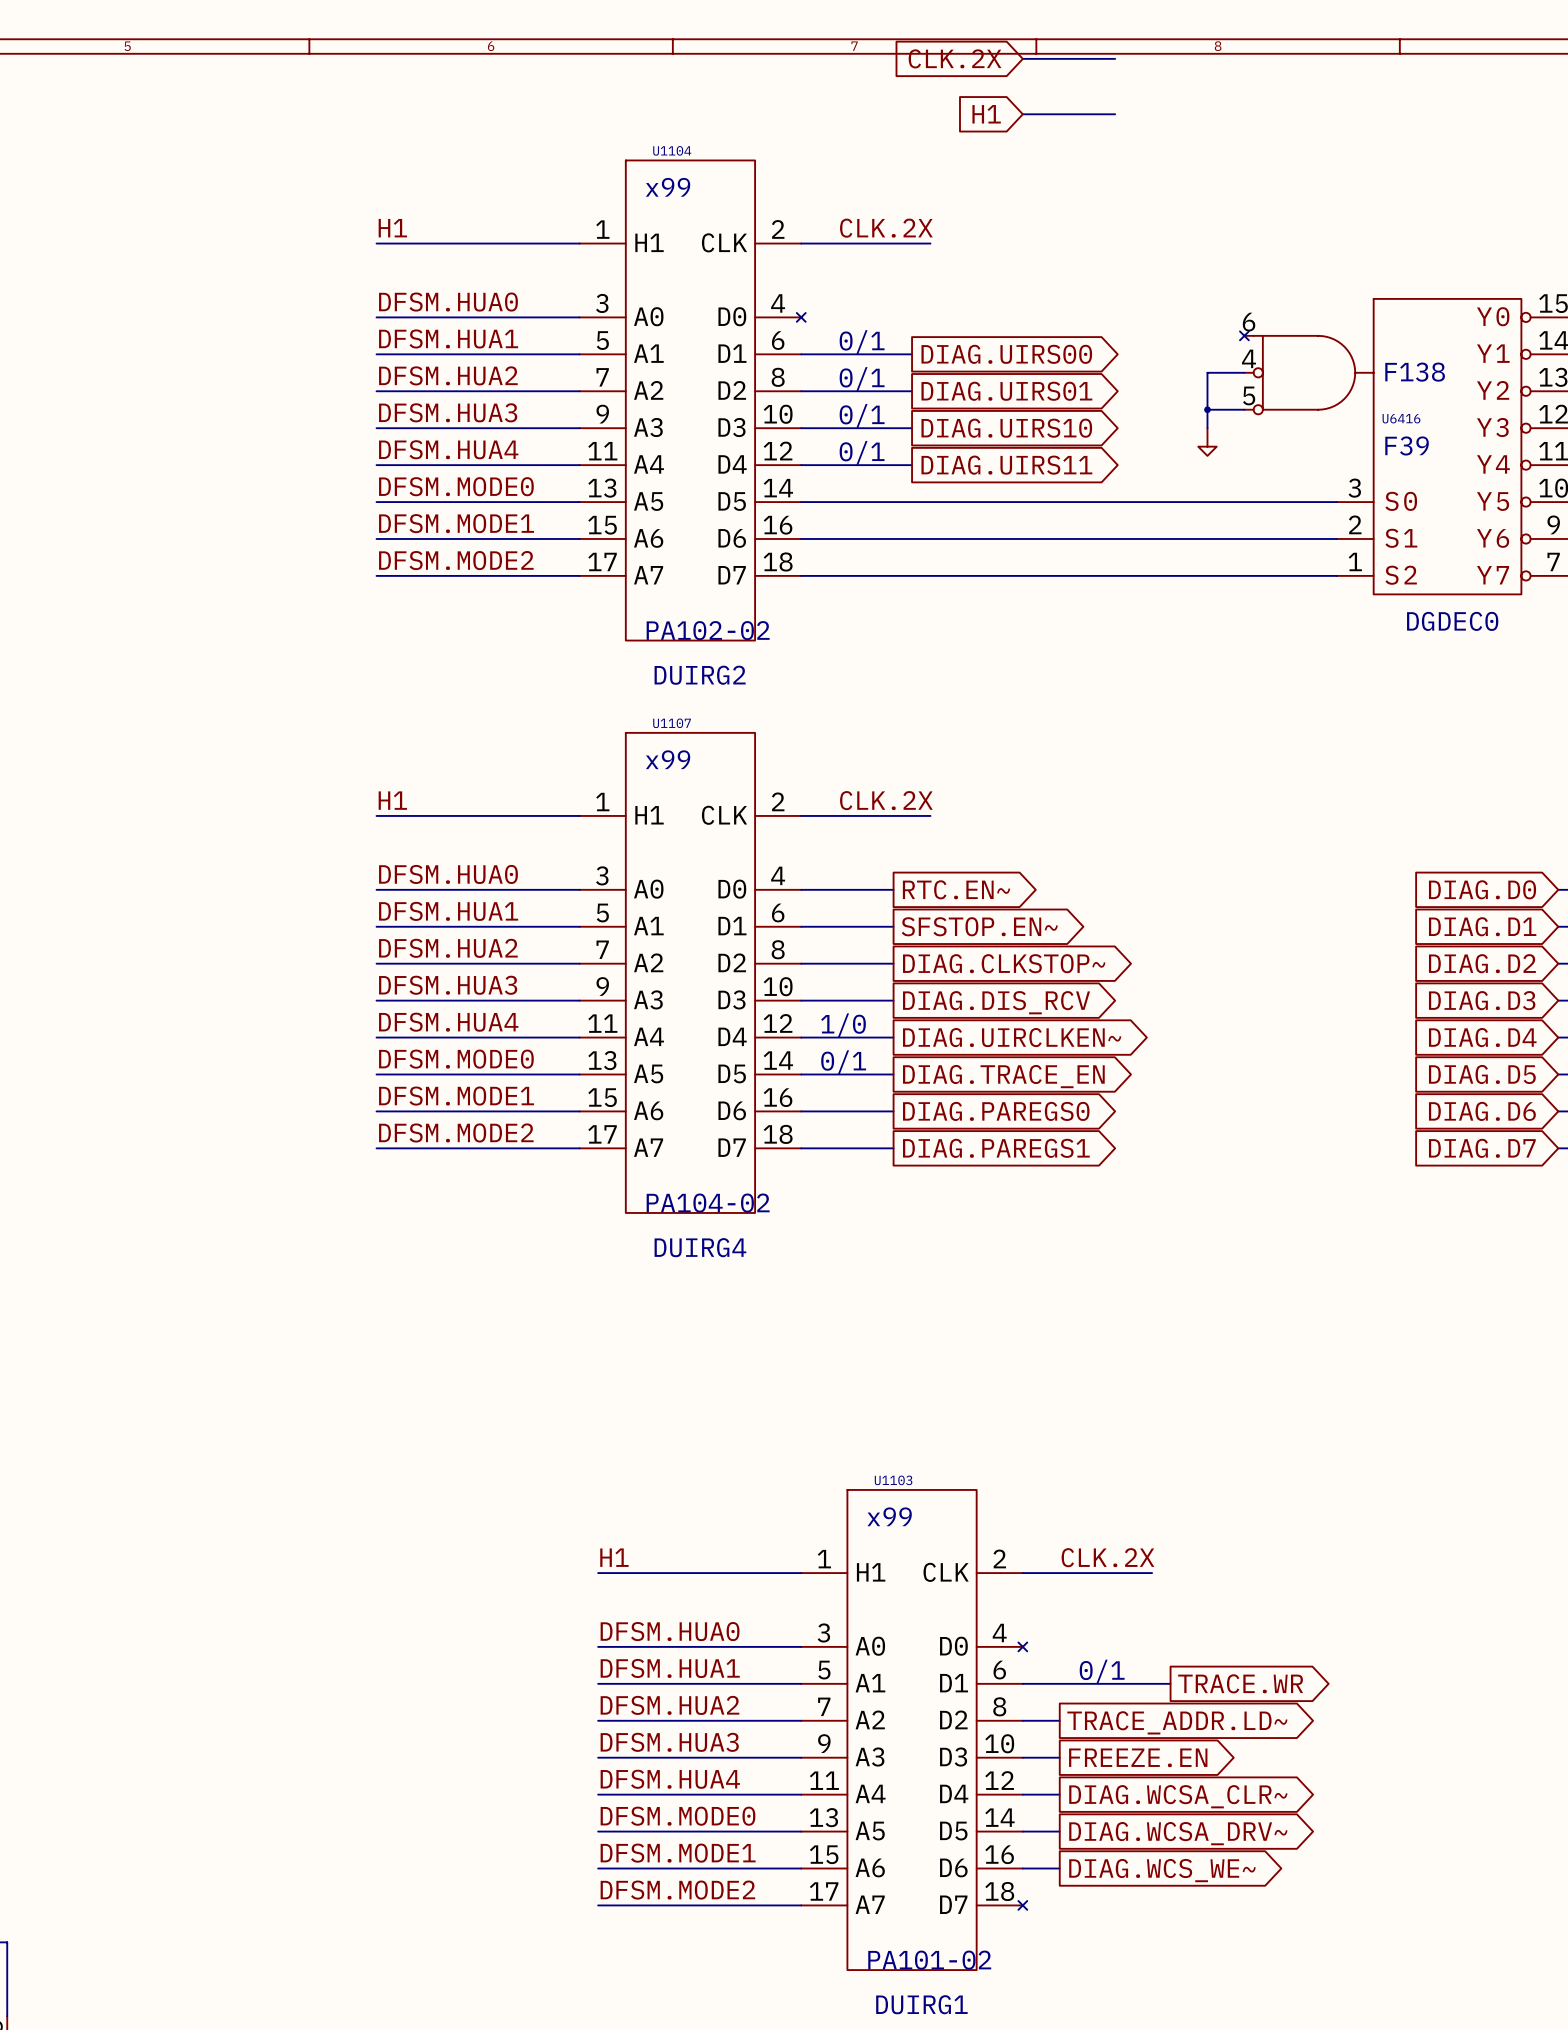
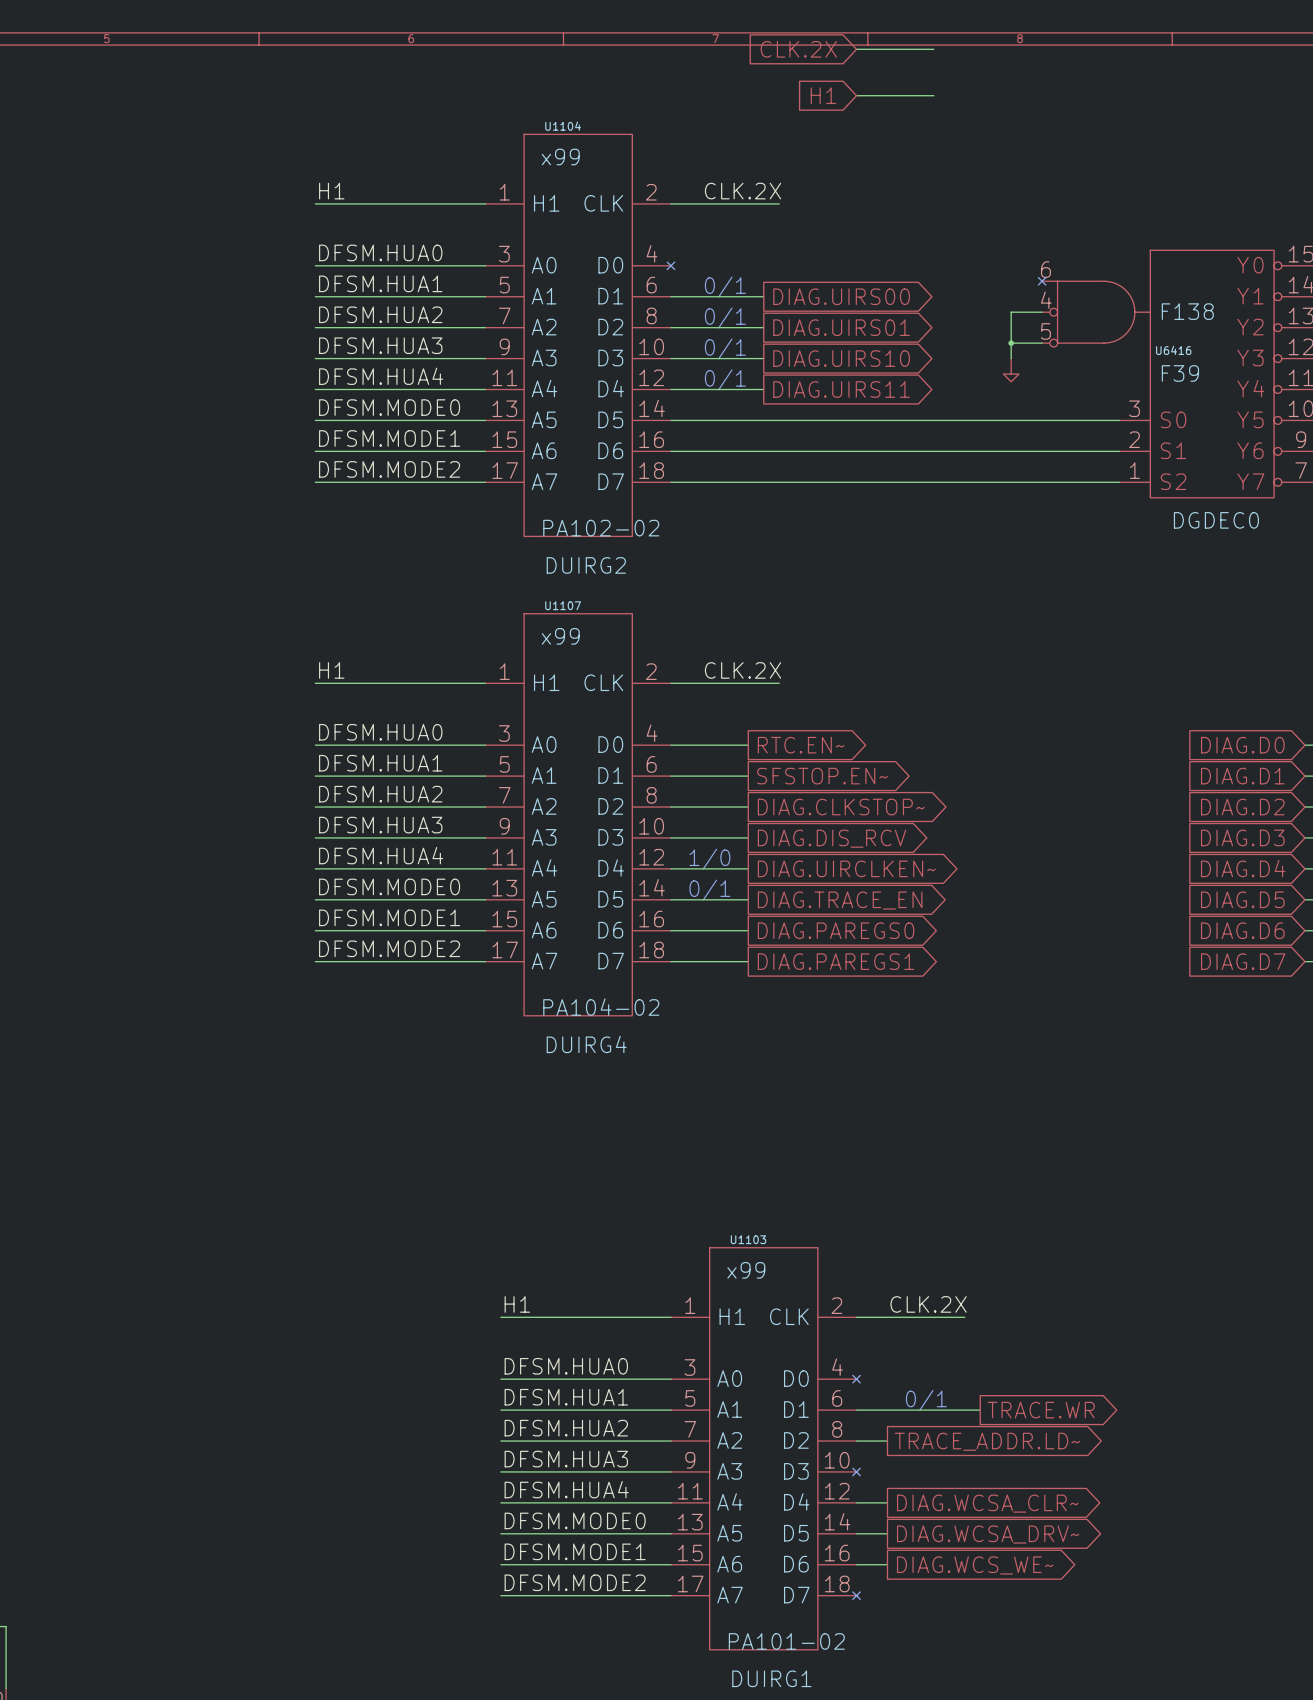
wire: (1022, 1757) (1059, 1757) -> none
no-connect mark: none -> (856, 1471)
global label: FREEZE.EN (1138, 1757) -> none

